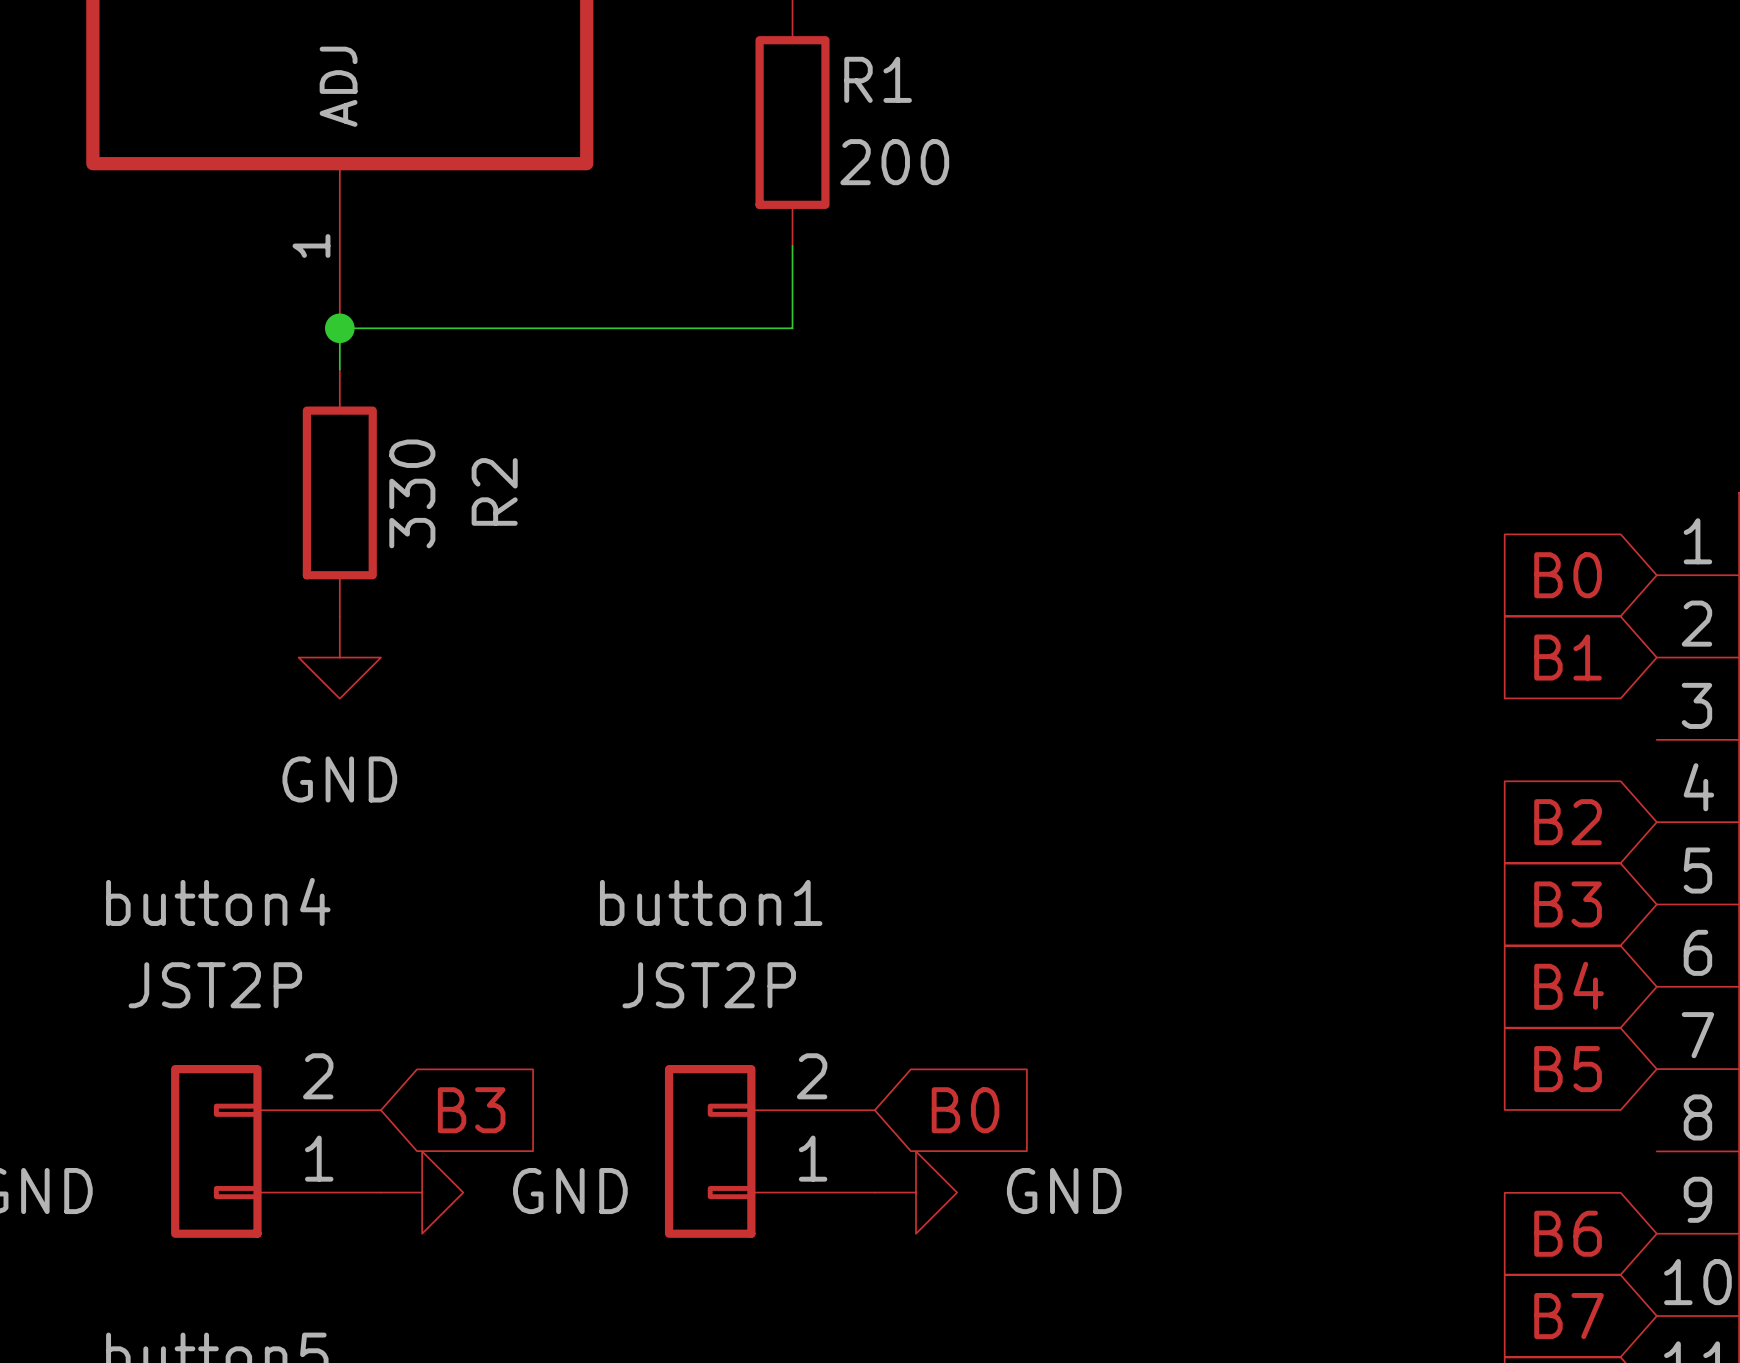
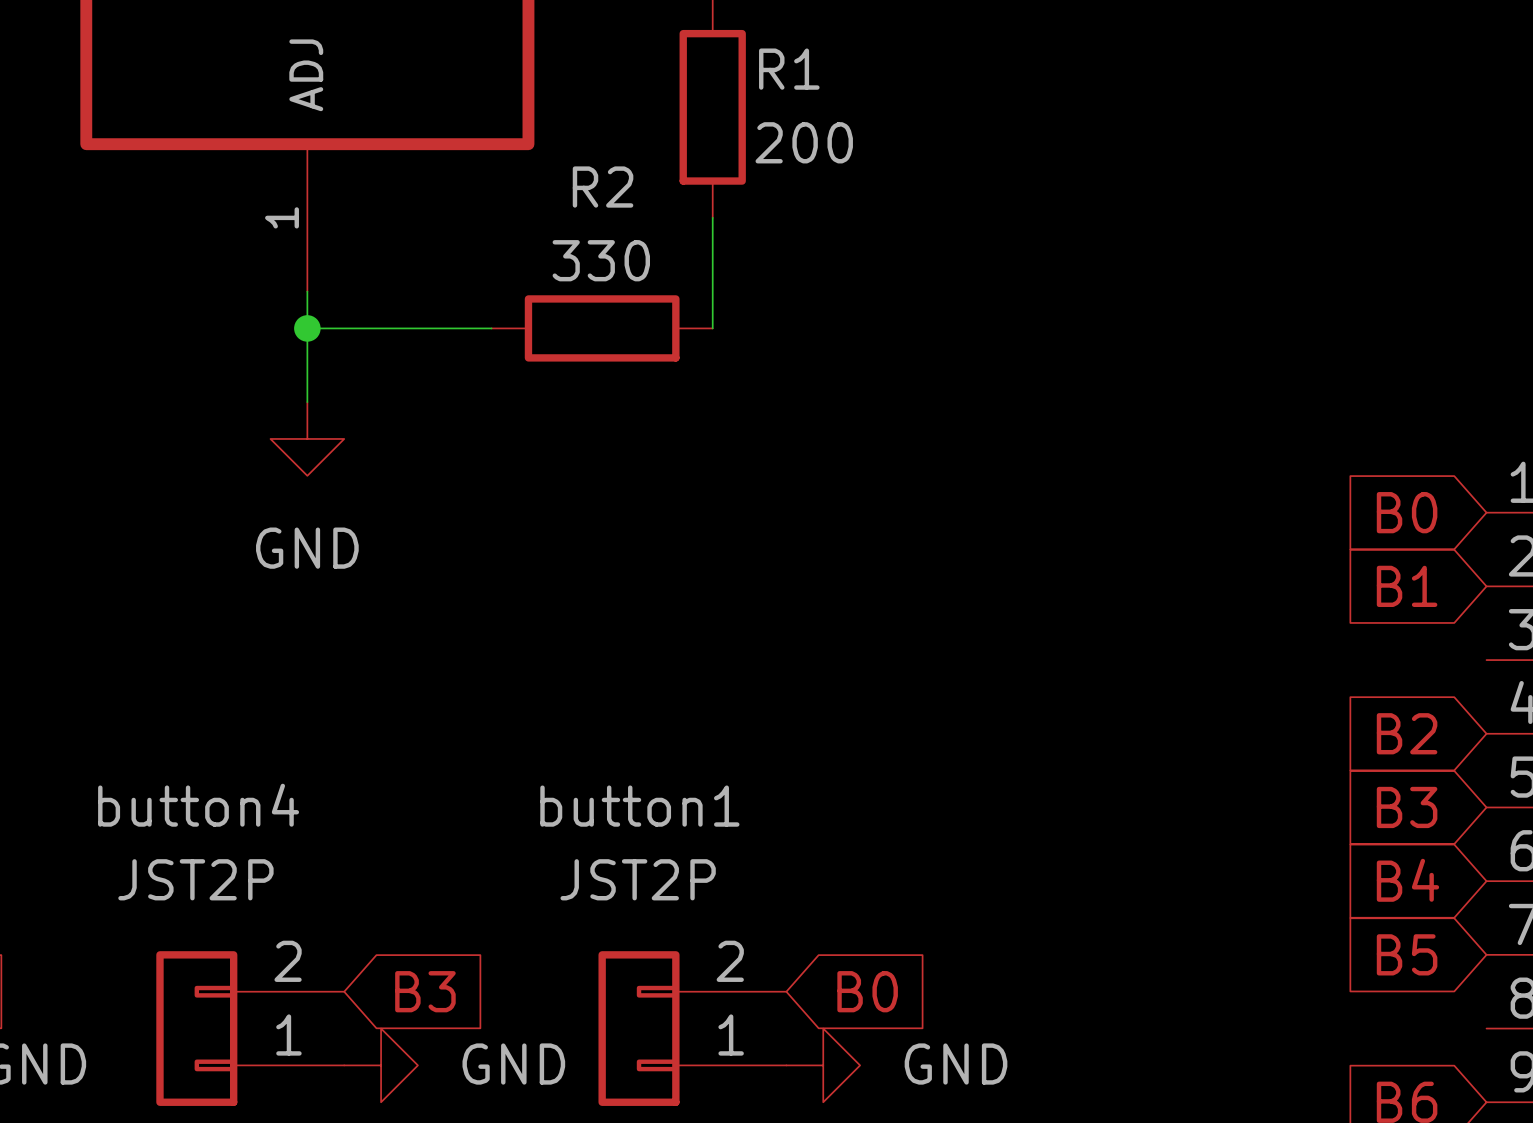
wire: (339, 328) (792, 328) -> (712, 328) (712, 291)
junction position: (339, 328) -> (307, 328)
wire: none -> (491, 328) (307, 328) (307, 402)
R2 name position: R2 (494, 491) -> R2 (603, 187)
R2 rotation: 0° (339, 492) -> 90° clockwise (602, 328)
R2 position: (339, 492) -> (602, 328)
R2 value position: 330 (412, 493) -> 330 (601, 260)
power symbol position: GND (339, 657) -> GND (307, 438)

